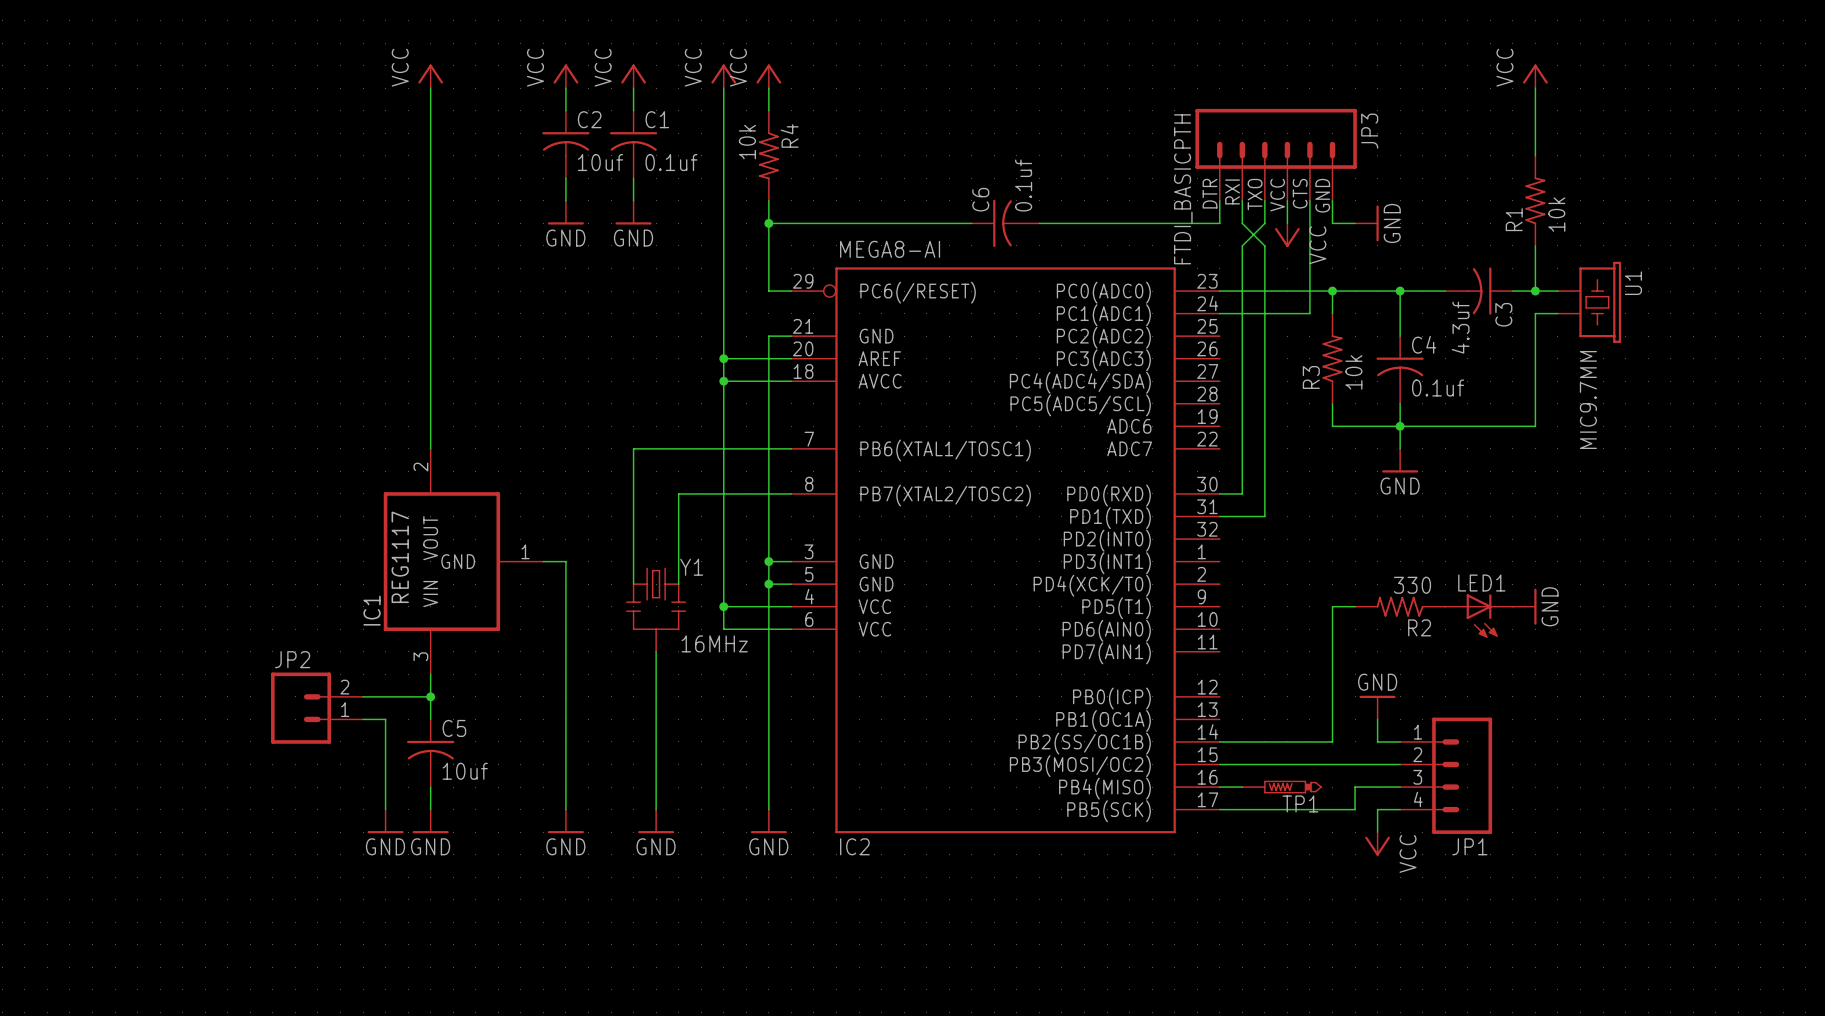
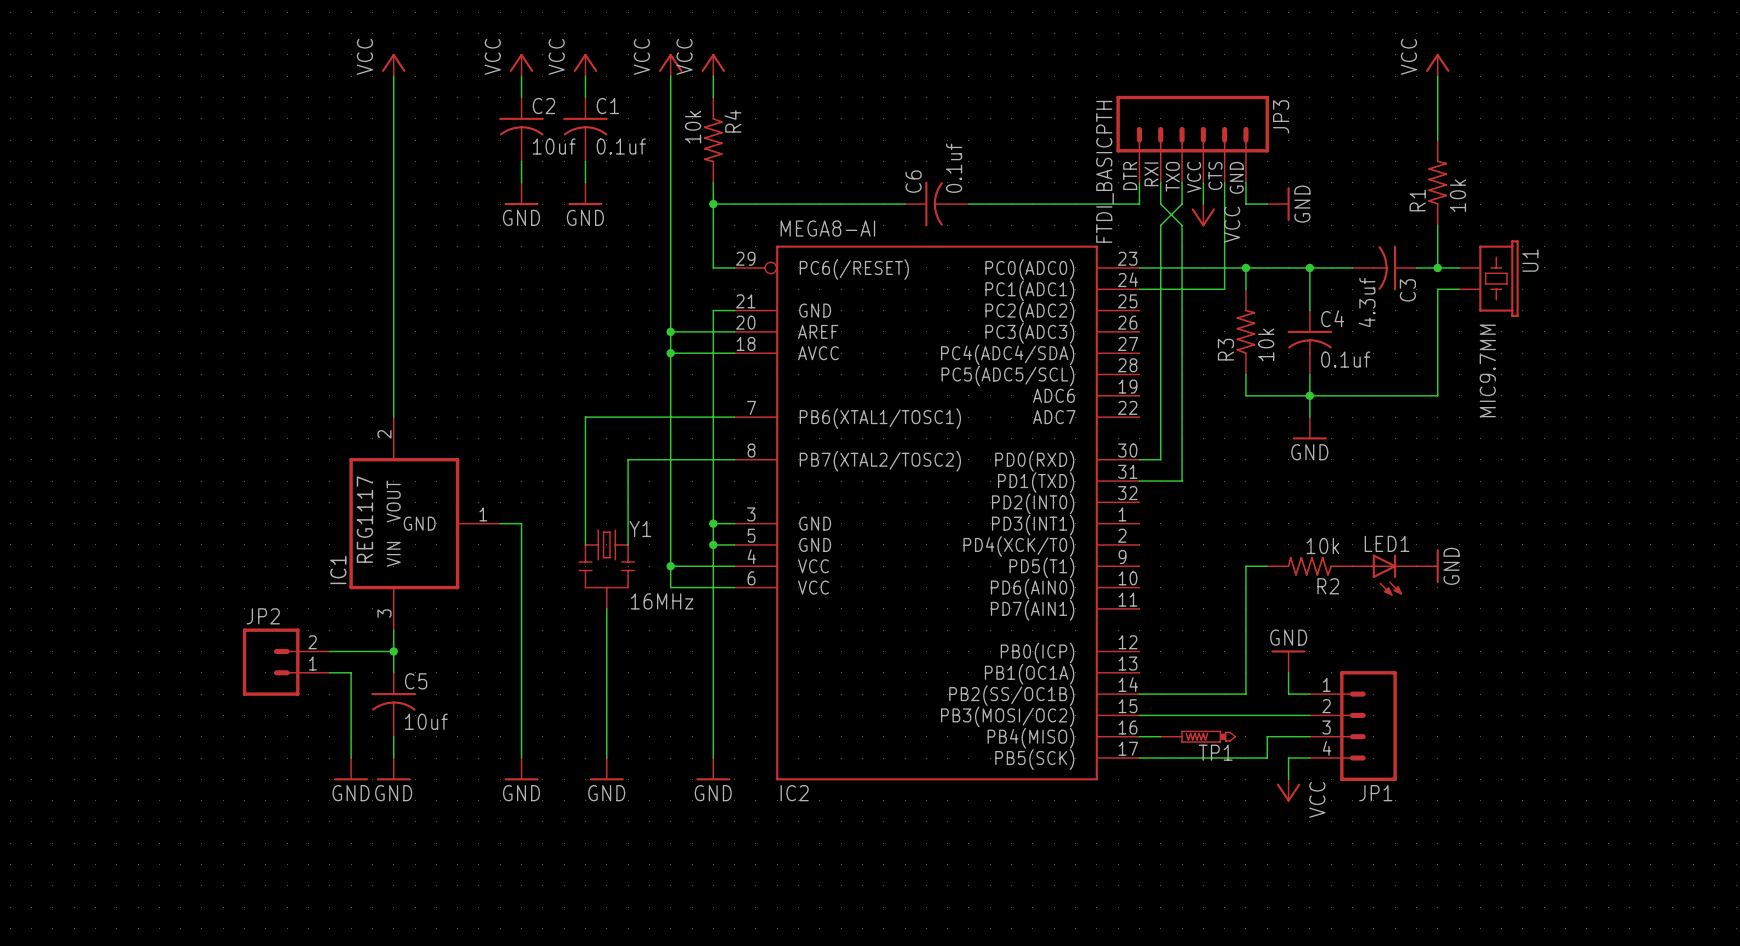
R2 value: 330 (1412, 585) -> 10k (1322, 546)

